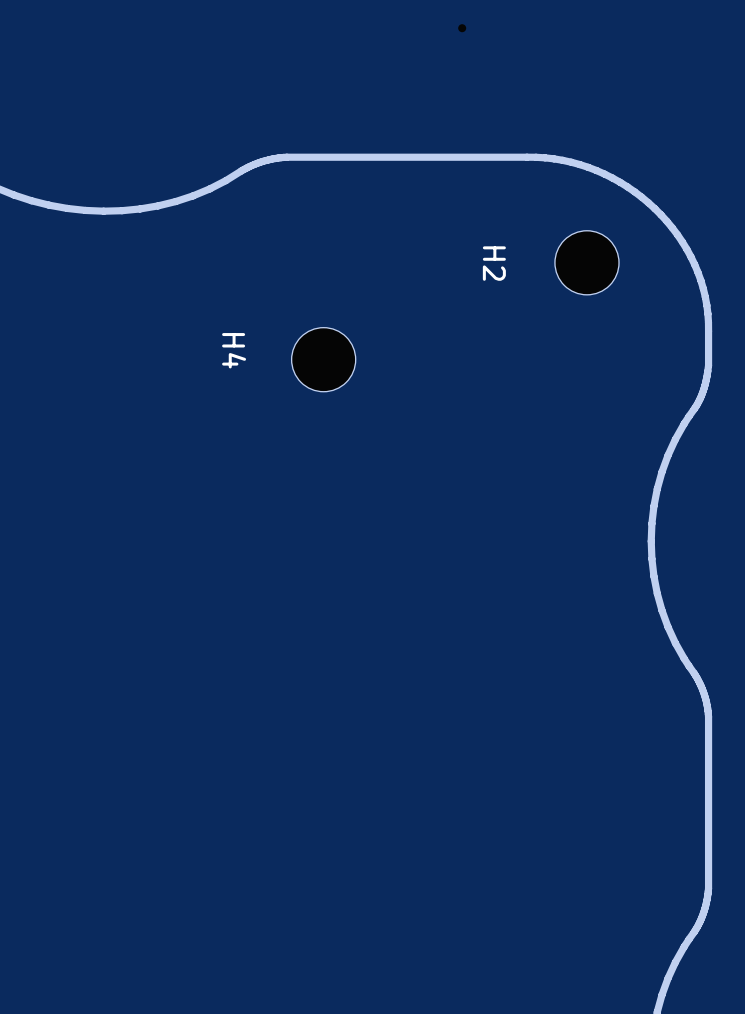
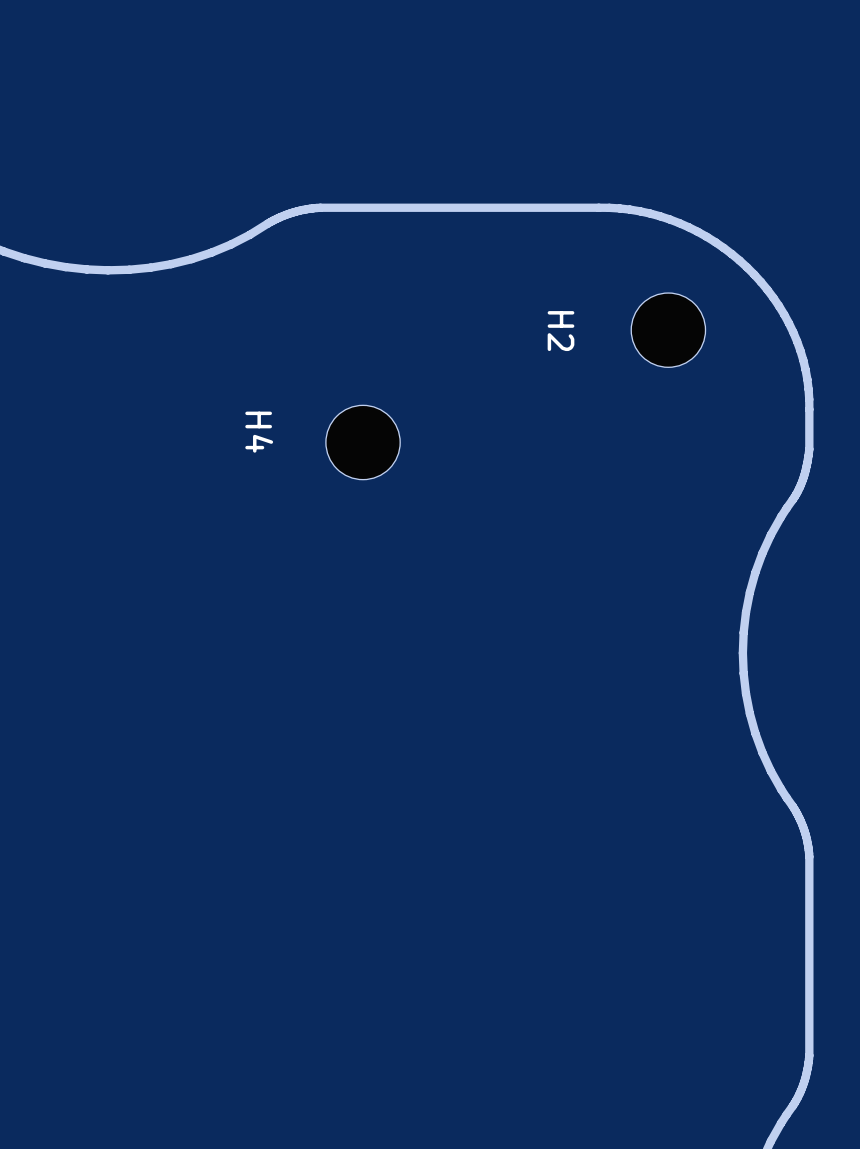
via: (462, 28) -> none

